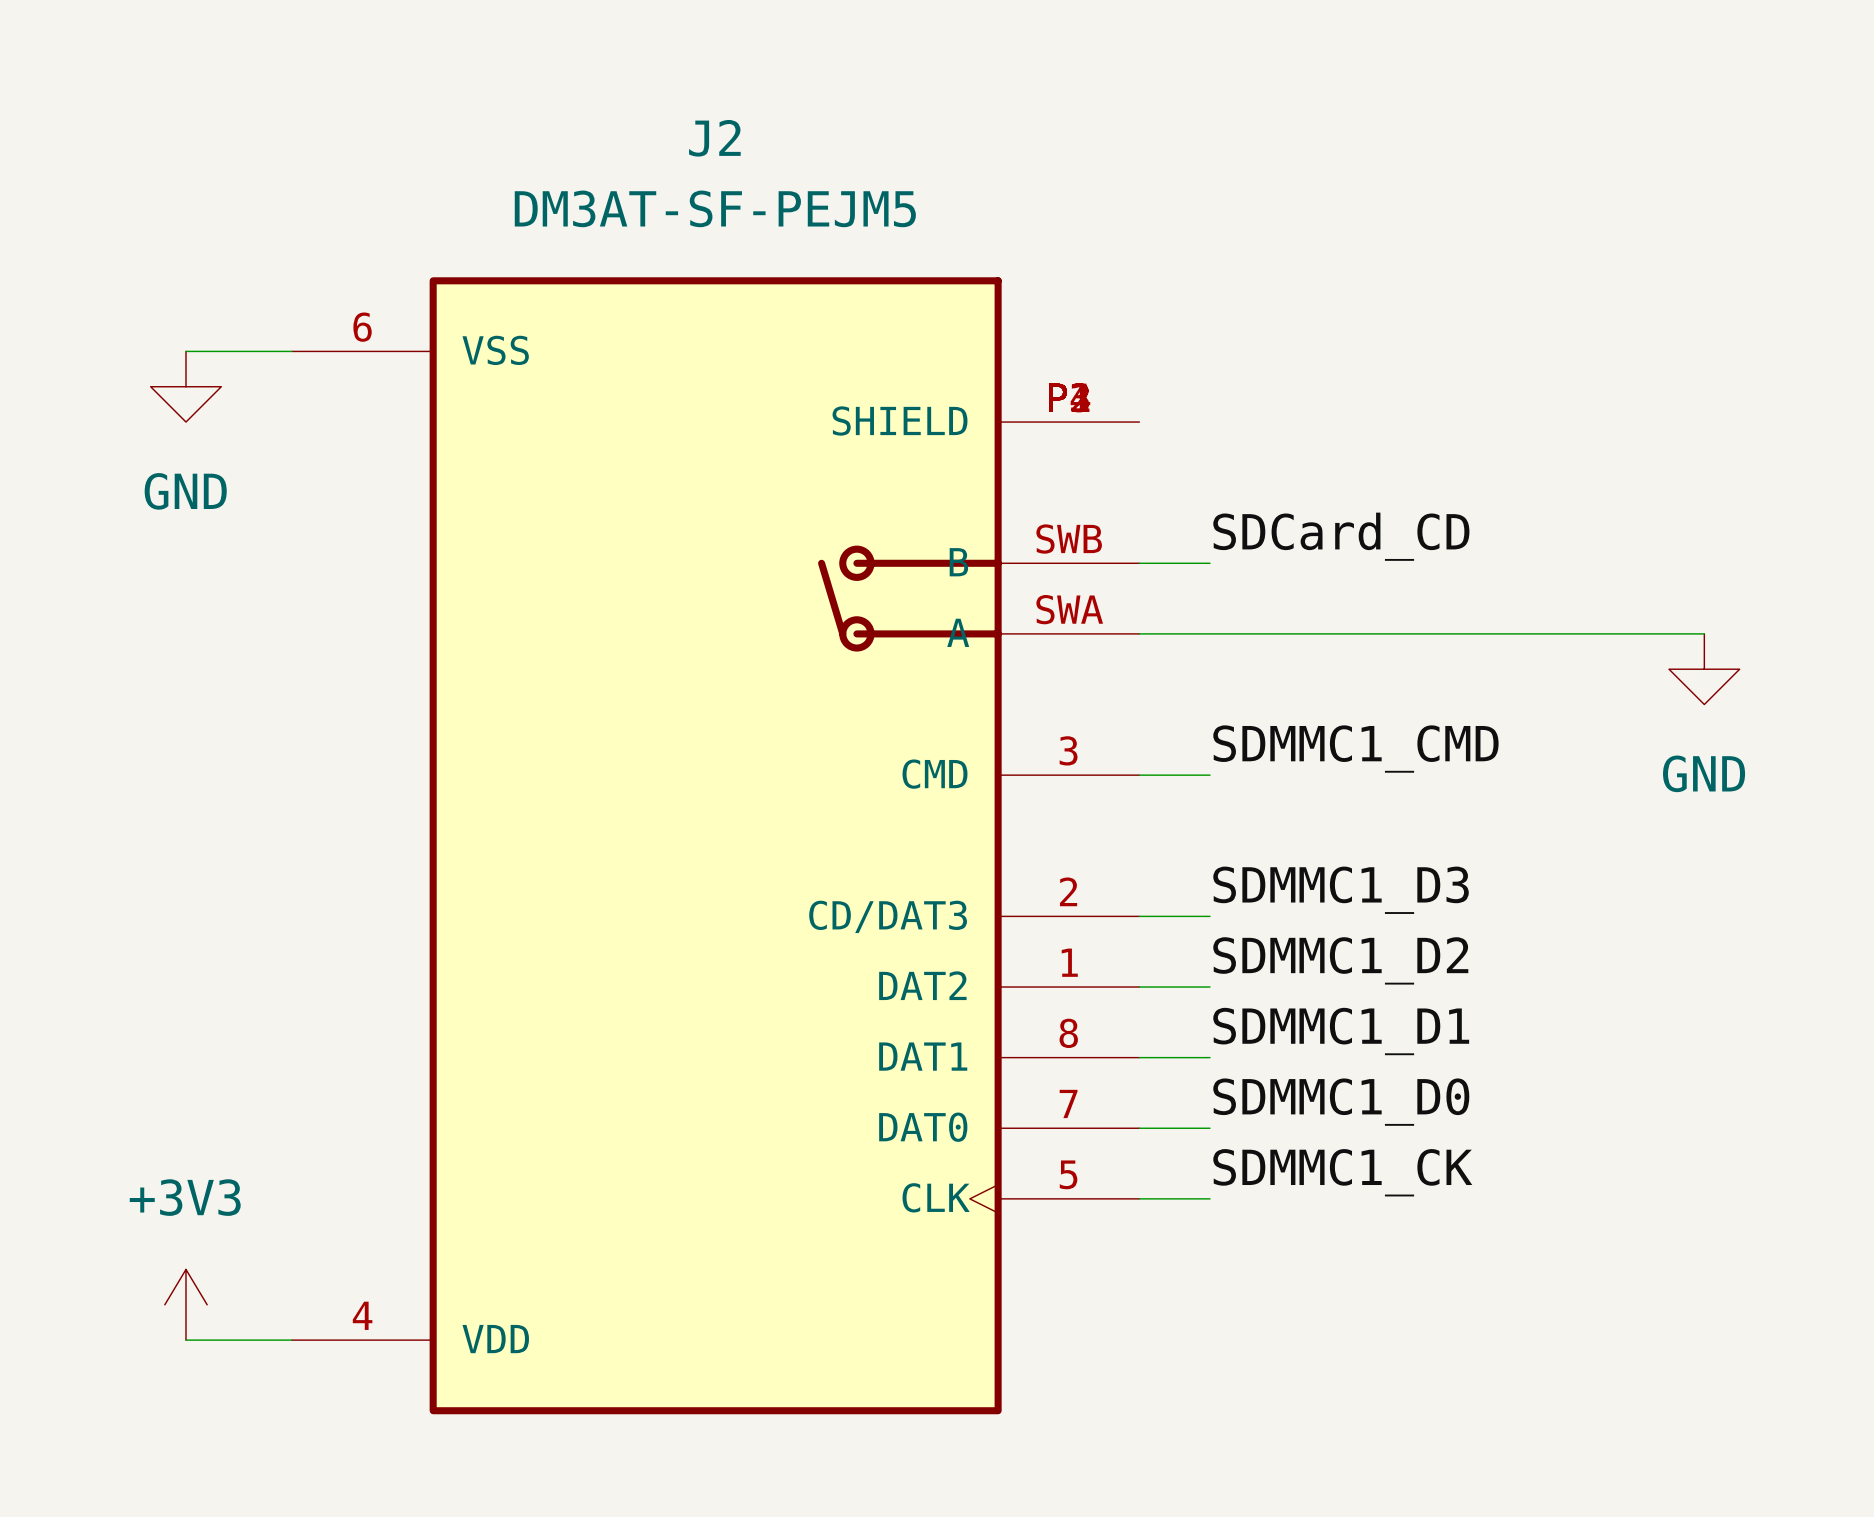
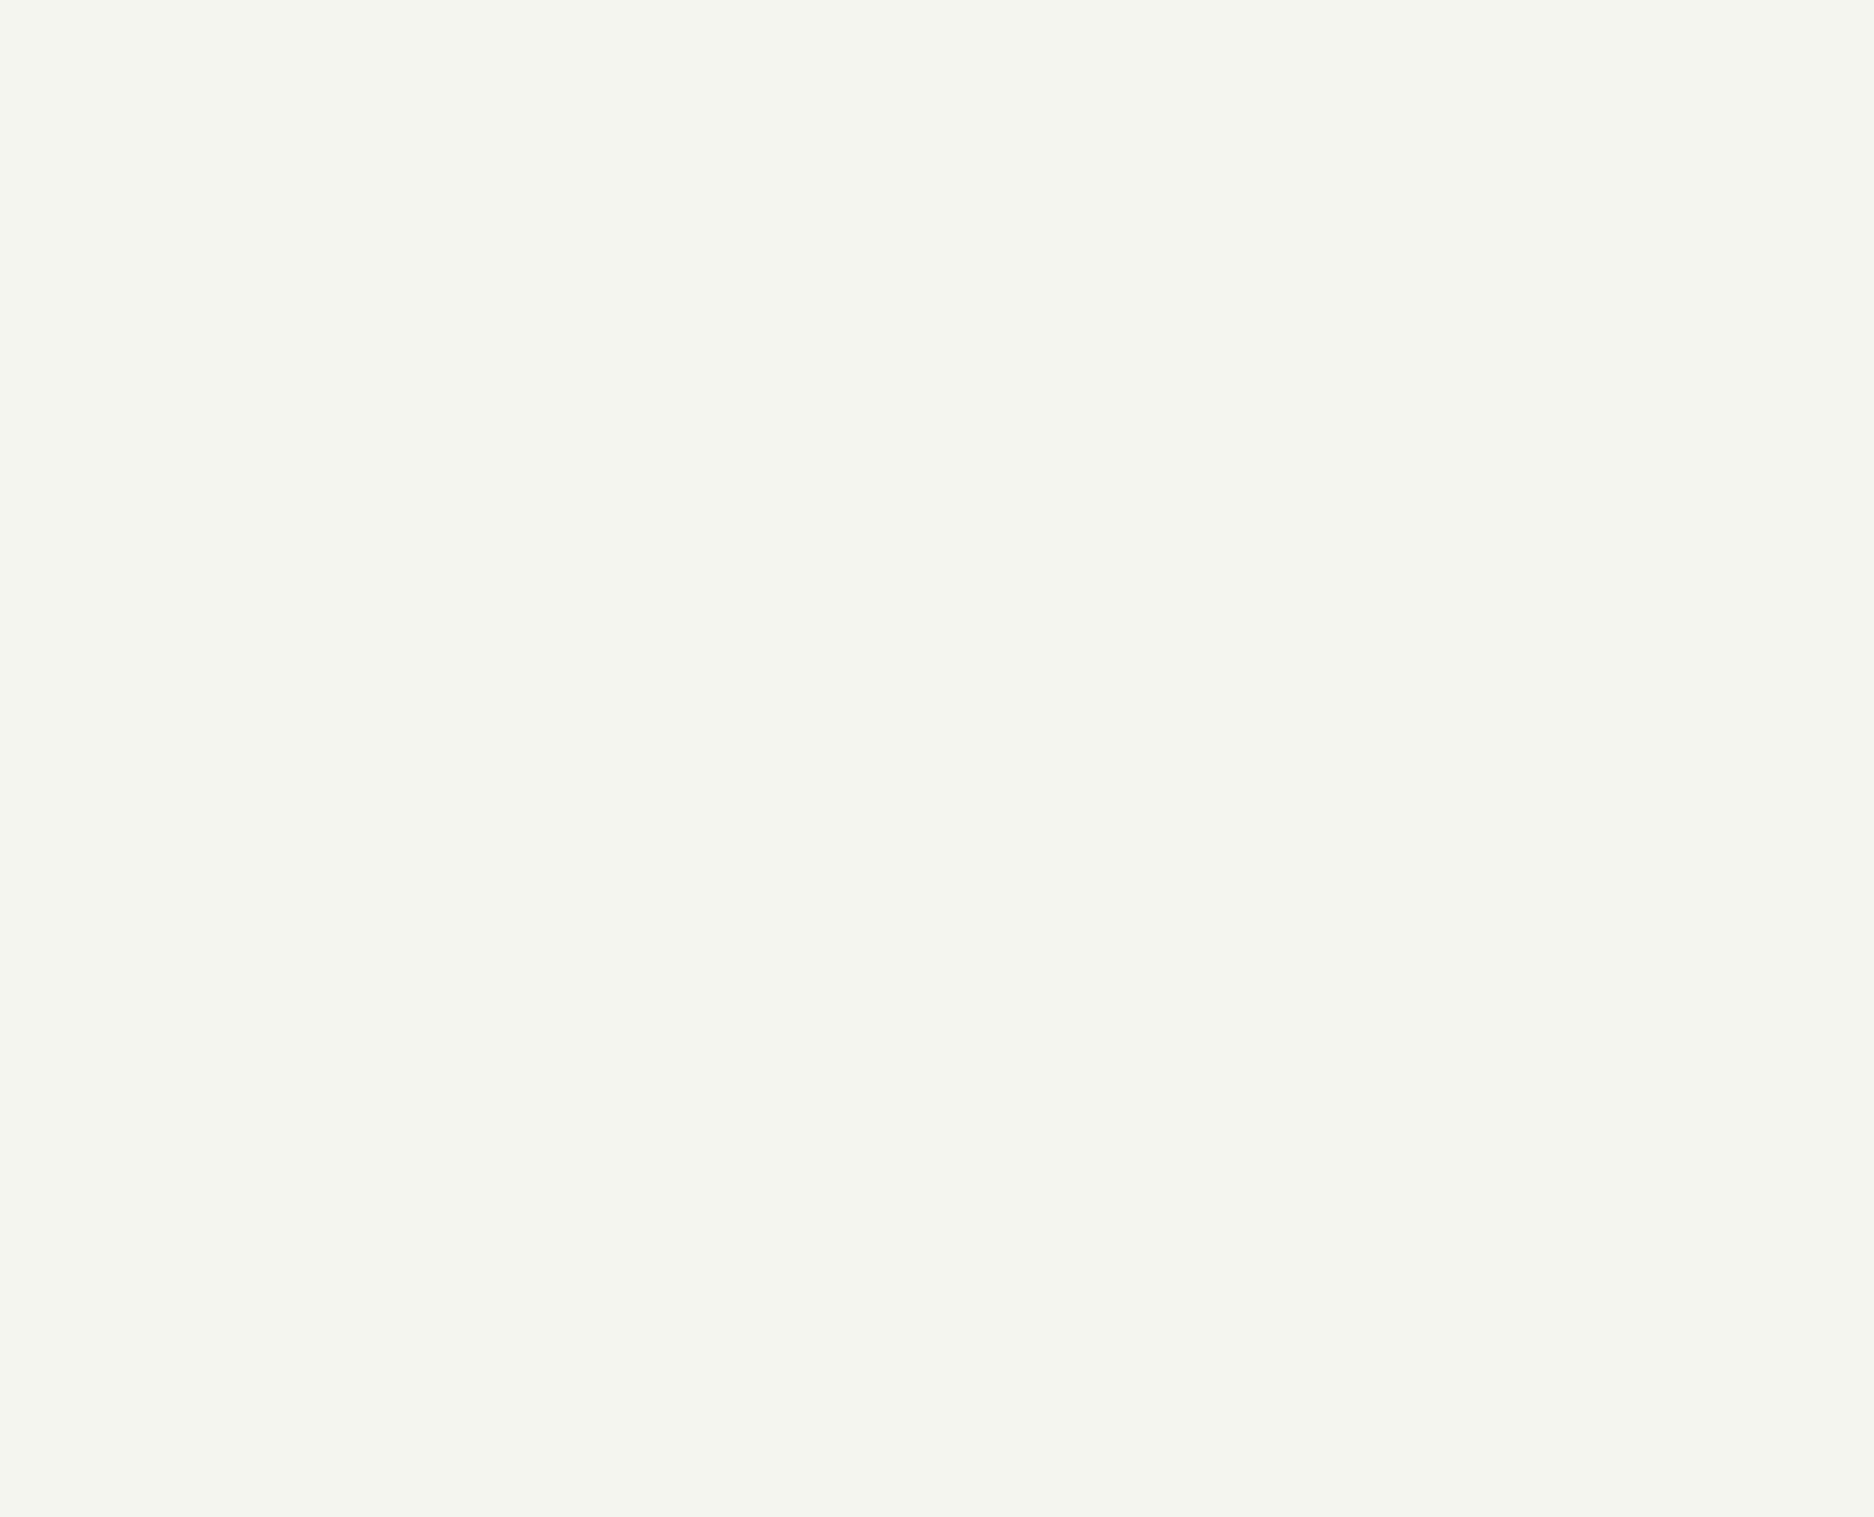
wire: (185, 351) (291, 351) -> none
power symbol: GND (185, 386) -> none
label: SDCard_CD (1341, 536) -> none
wire: (1139, 563) (1209, 563) -> none
wire: (1139, 633) (1704, 633) -> none
power symbol: GND (1704, 669) -> none
label: SDMMC1_CMD (1355, 749) -> none
wire: (1139, 775) (1209, 775) -> none
J2: DM3AT-SF-PEJM5 (715, 845) -> none
label: SDMMC1_D3 (1341, 890) -> none
wire: (1139, 916) (1209, 916) -> none
label: SDMMC1_D2 (1340, 960) -> none
wire: (1139, 987) (1209, 987) -> none
label: SDMMC1_D1 (1341, 1031) -> none
wire: (1139, 1057) (1209, 1057) -> none
label: SDMMC1_D0 (1341, 1102) -> none
wire: (1139, 1128) (1209, 1128) -> none
label: SDMMC1_CK (1342, 1172) -> none
wire: (1139, 1198) (1209, 1198) -> none
power symbol: +3V3 (185, 1304) -> none
wire: (185, 1340) (291, 1340) -> none

